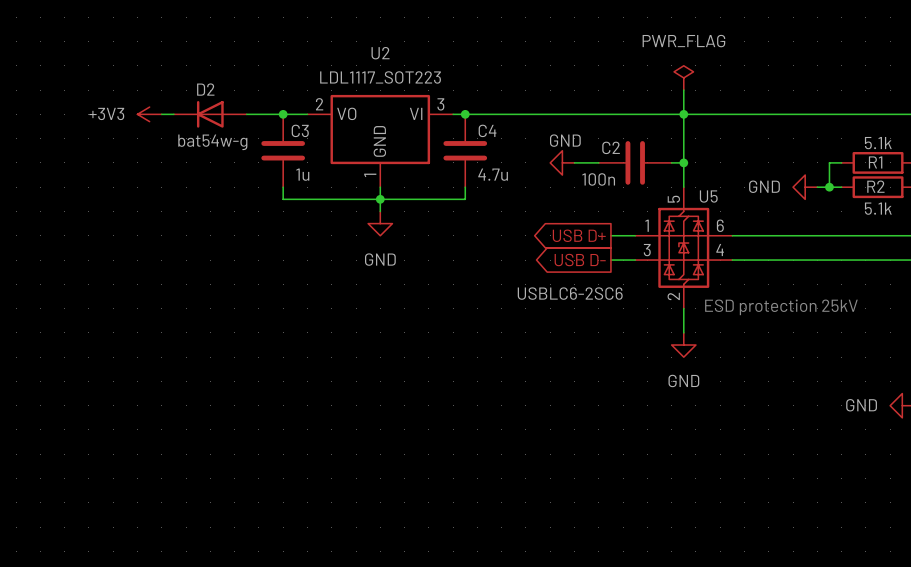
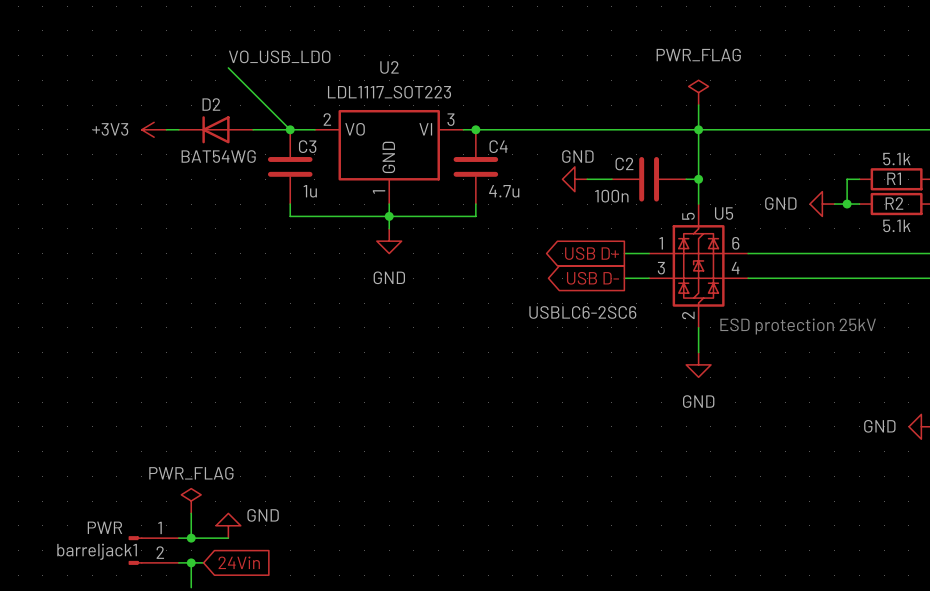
label: none -> VO_USB_LDO (279, 56)
wire: none -> (228, 67) (290, 129)
D2 value: bat54w-g (212, 142) -> BAT54WG (218, 156)
power symbol: none -> PWR_FLAG (191, 501)
wire: none -> (191, 513) (191, 538)
power symbol: none -> GND (228, 525)
wire: none -> (178, 538) (228, 538)
junction: none -> (191, 538)
barreljack1: none -> PWR (153, 550)
wire: none -> (178, 562) (203, 562)
wire: none -> (191, 562) (191, 587)
junction: none -> (191, 562)
global label: none -> 24Vin (239, 562)

